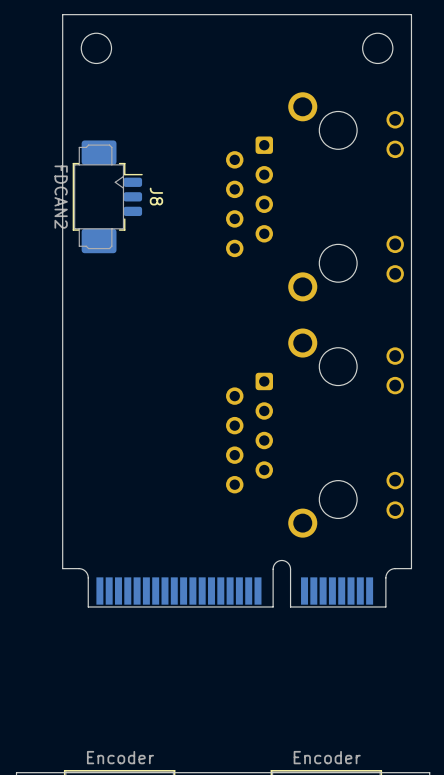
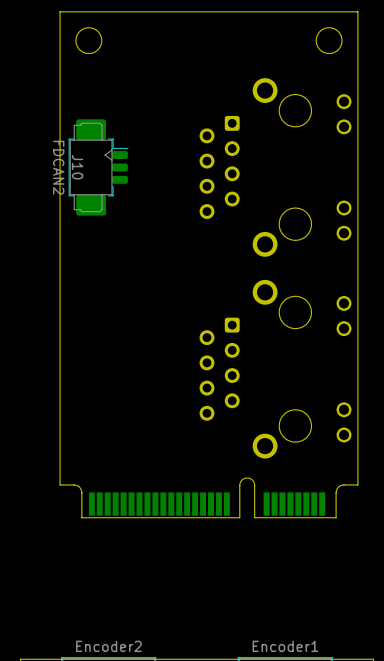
J8 name: J8 (156, 196) -> J10 (77, 167)
part value: Encoder (120, 757) -> Encoder2 (108, 646)
part value: Encoder (327, 757) -> Encoder1 (285, 646)

